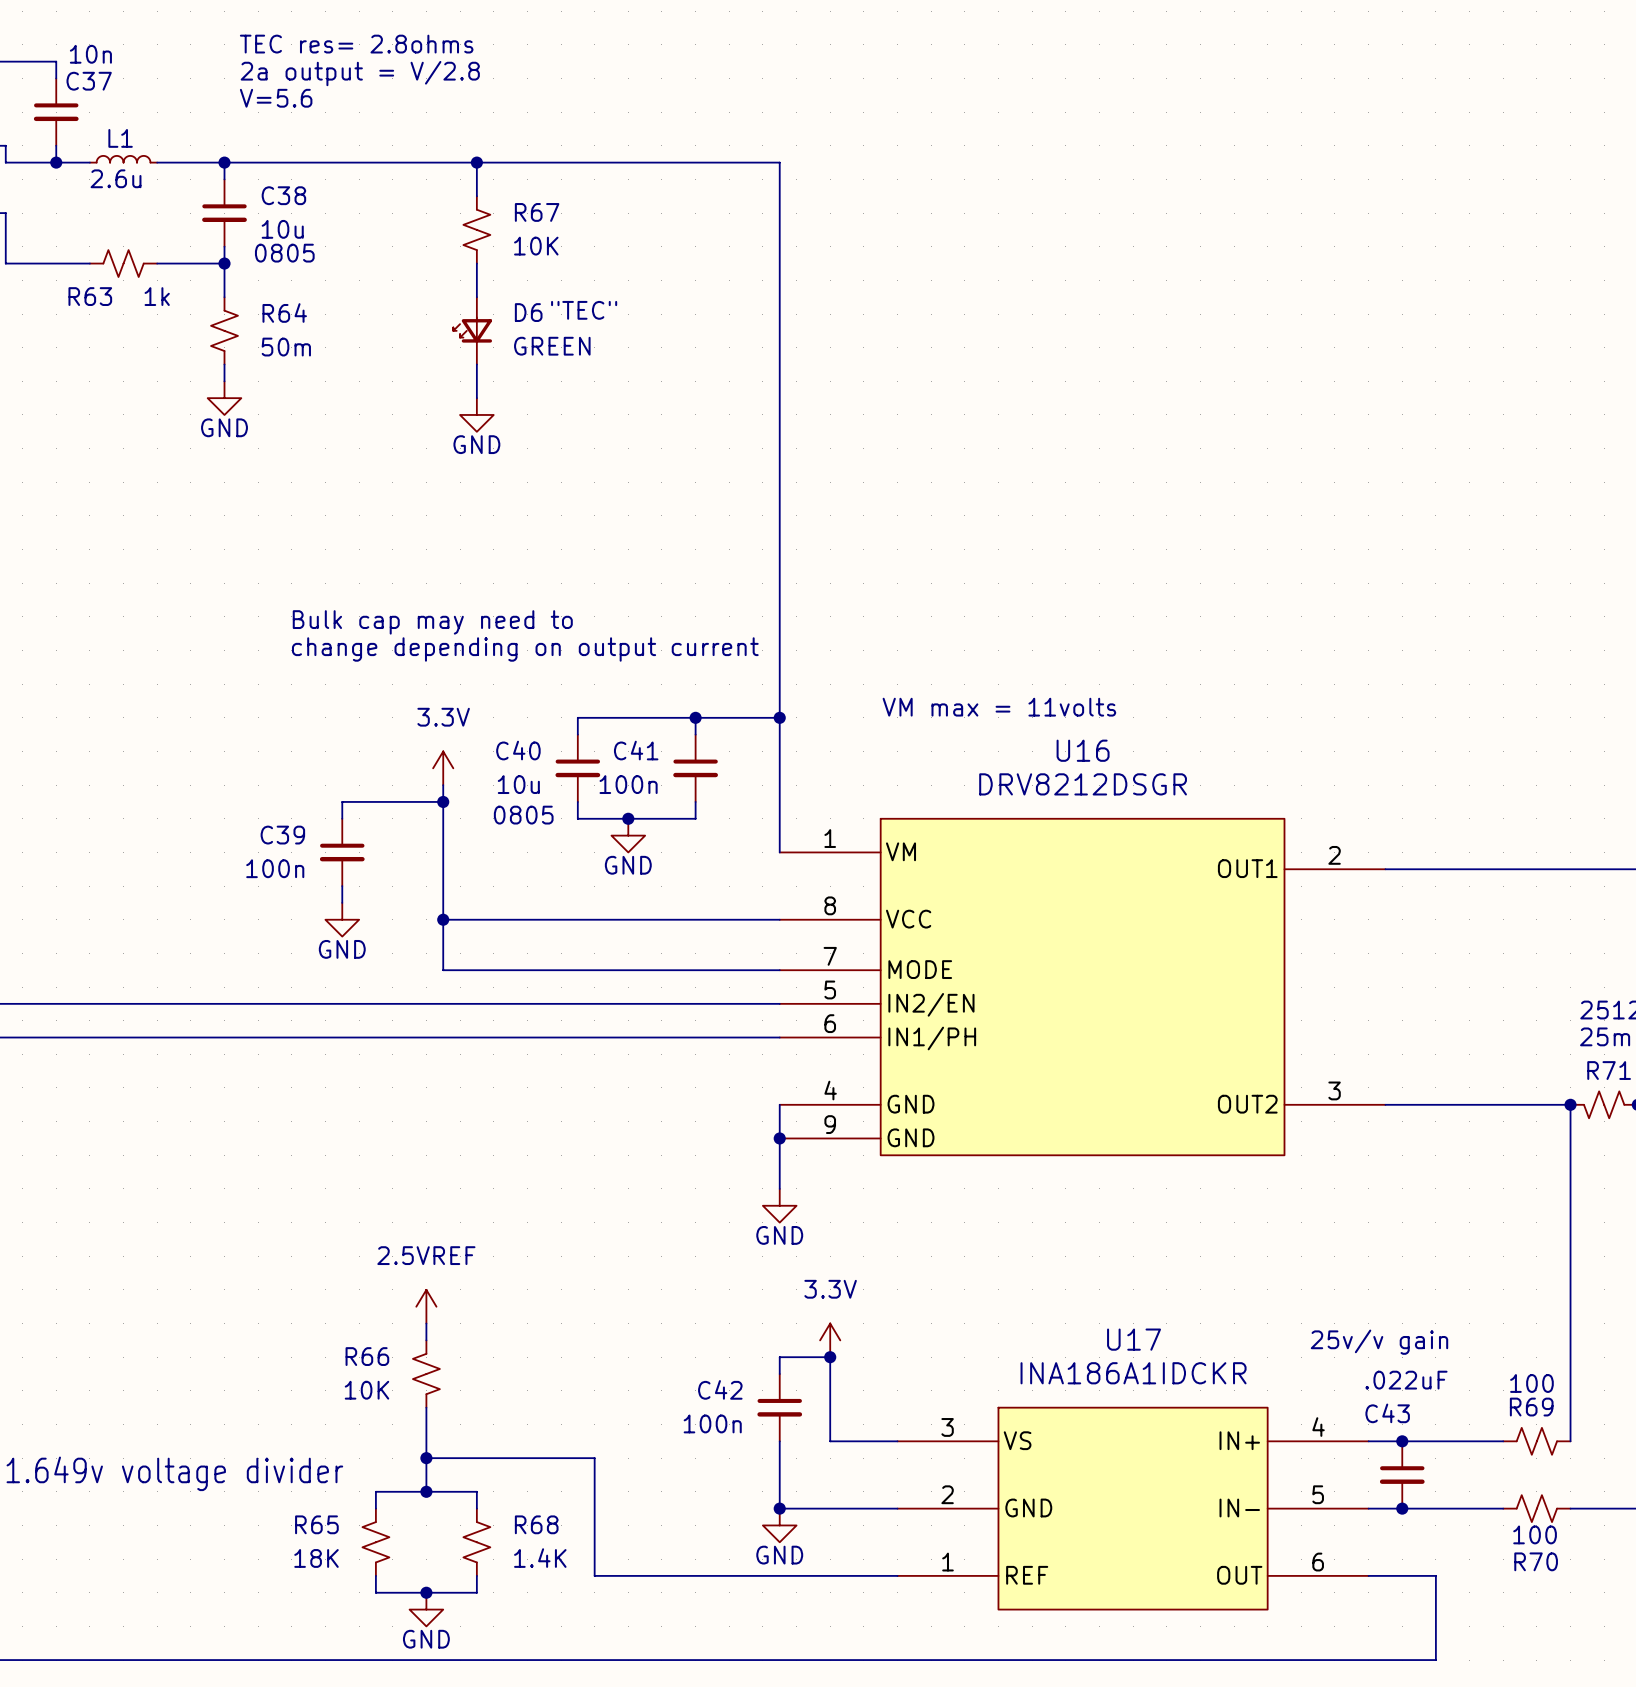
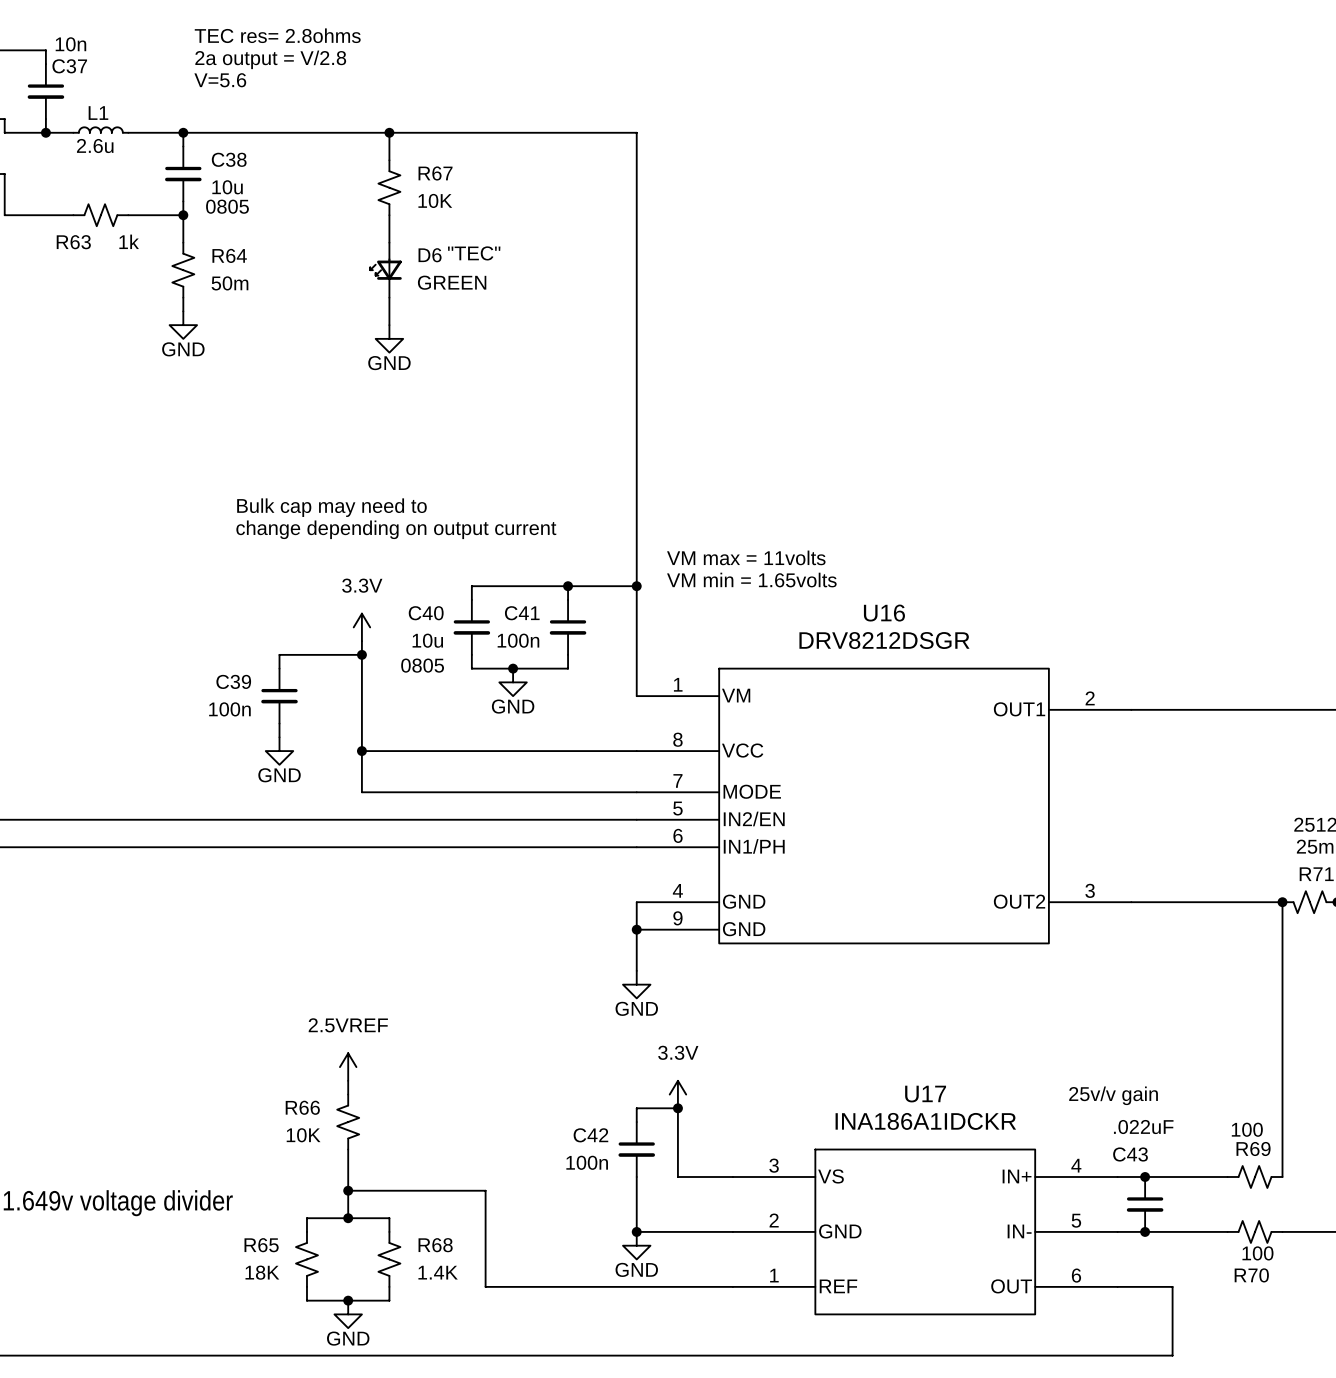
text position: VM max = 11volts (999, 707) -> VM max = 11volts (746, 557)
text: none -> VM min = 1.65volts (751, 580)

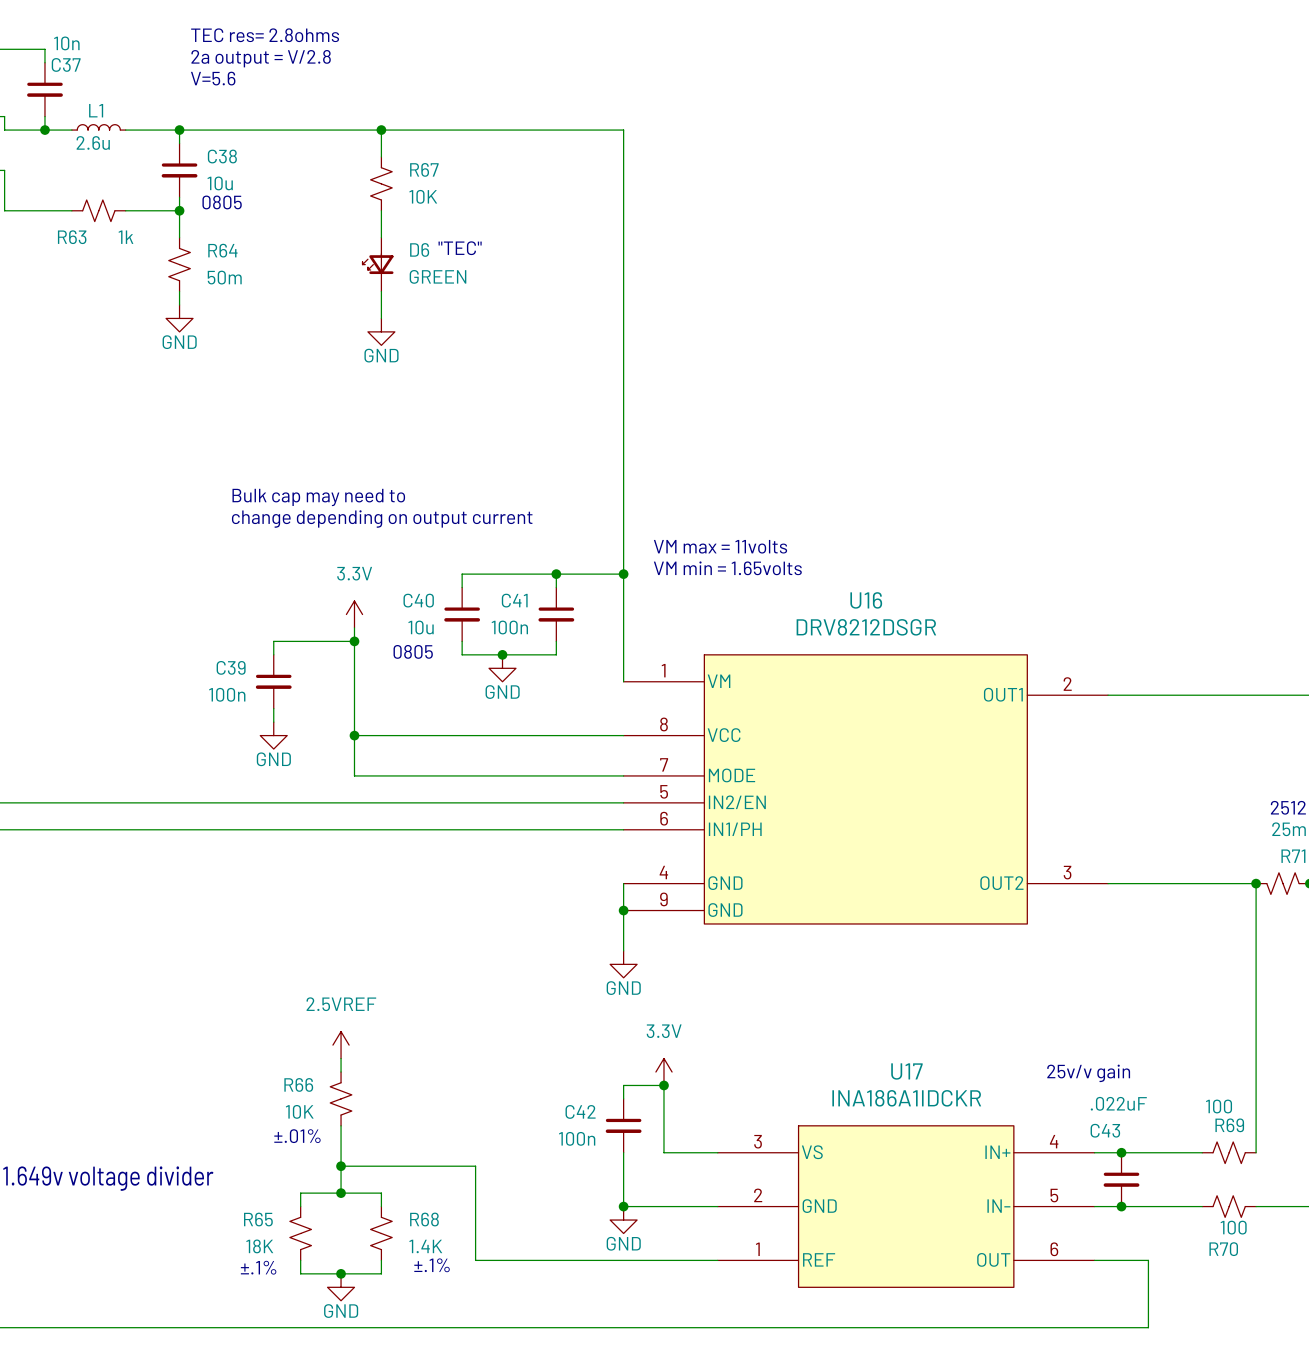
text: none -> ±.01% (297, 1136)
text: none -> ±.1% (432, 1265)
text: none -> ±.1% (258, 1267)

